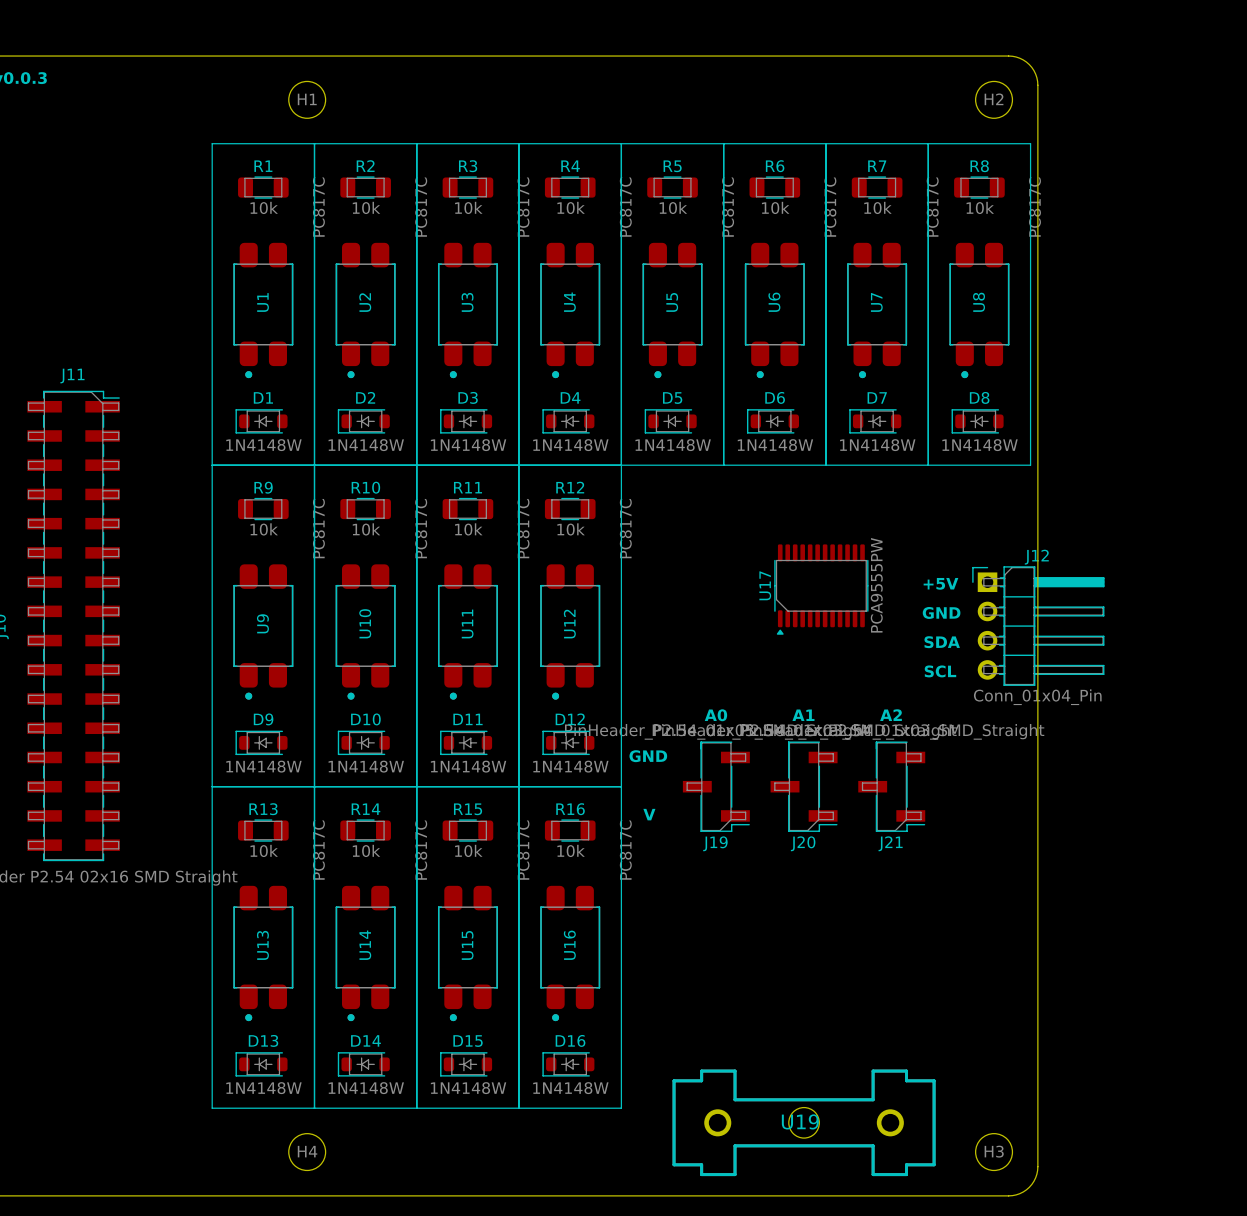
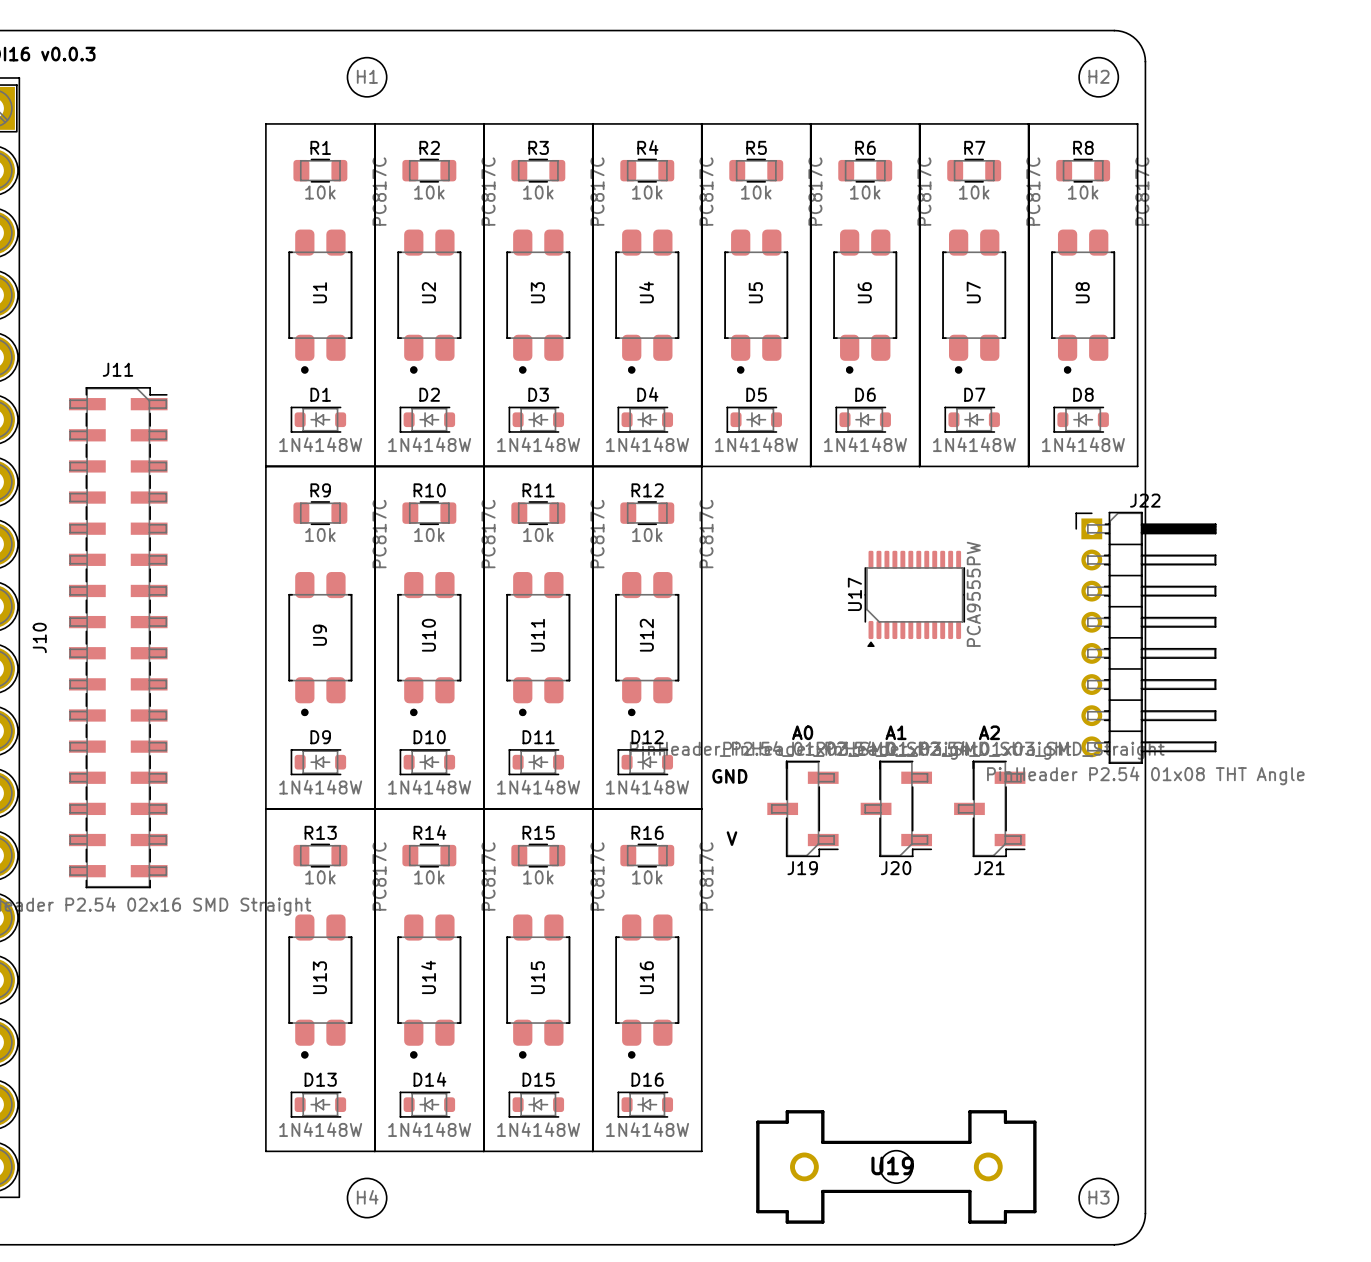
text: +5V (940, 583) -> none
text: GND (941, 612) -> none
J12: Conn_01x04_Pin (1038, 626) -> none
J22: none -> PinHeader P2.54 01x08 THT Angle (1145, 637)
text: SDA (942, 642) -> none
text: SCL (940, 671) -> none

